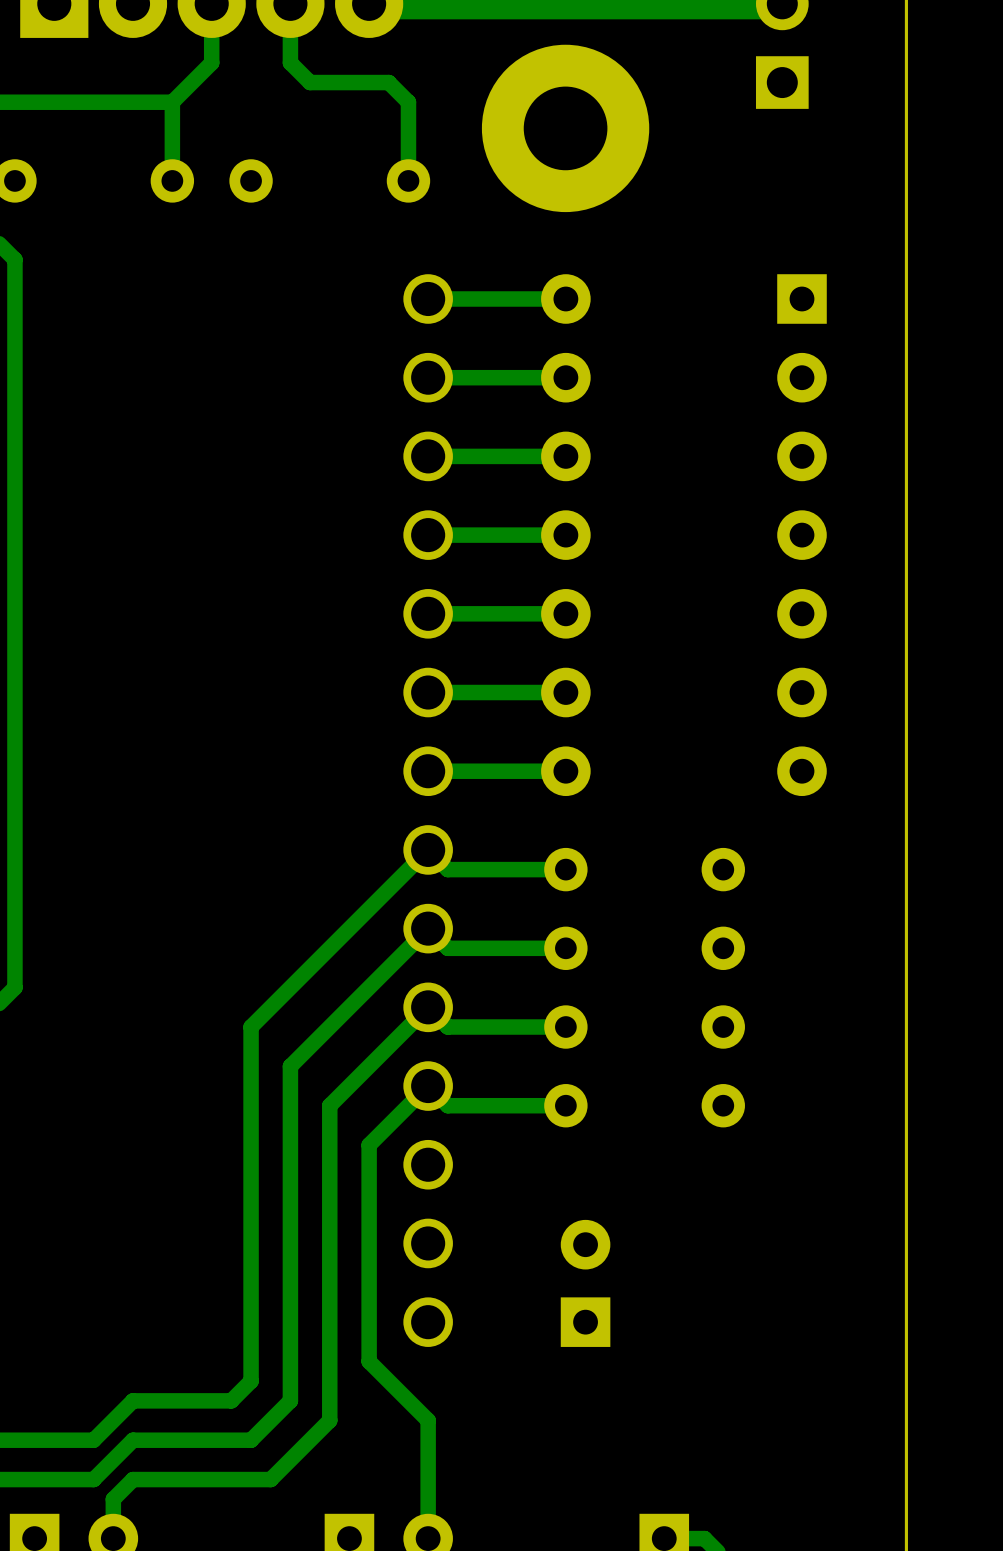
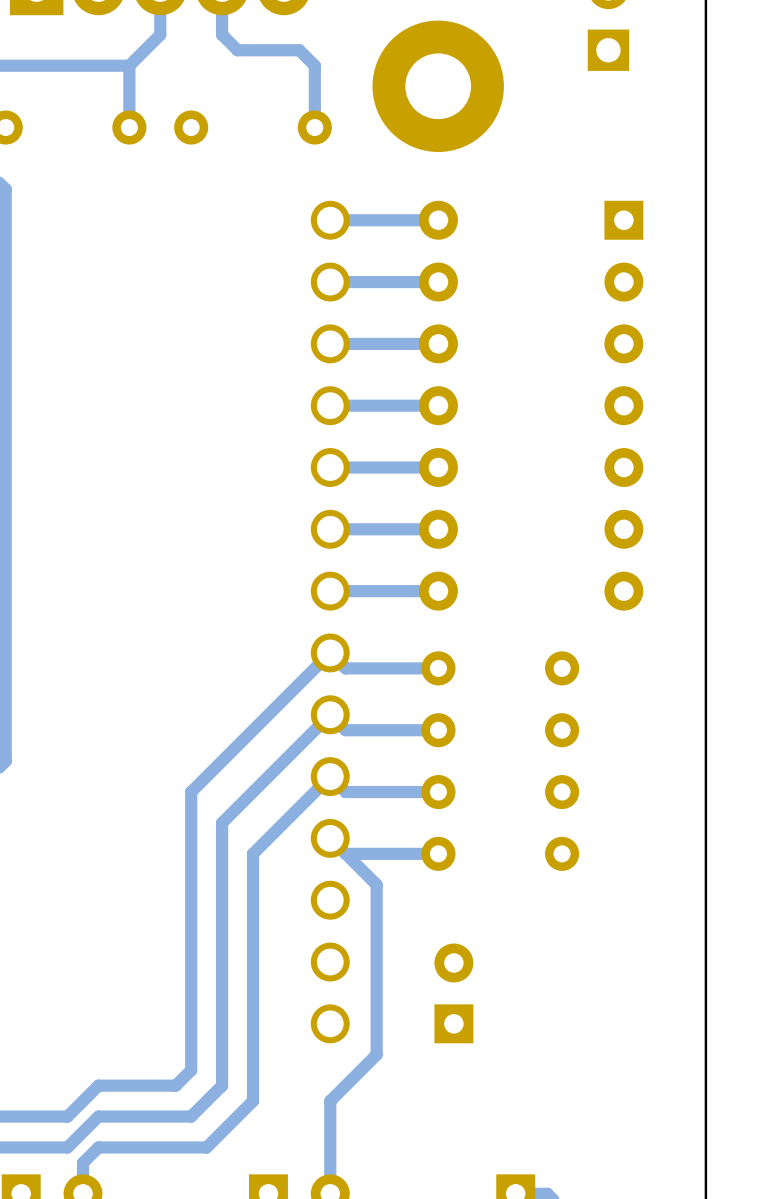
track: (428, 1086) (369, 1145) (369, 1361) (428, 1420) -> (345, 853) (376, 884) (376, 1054) (330, 1101)

